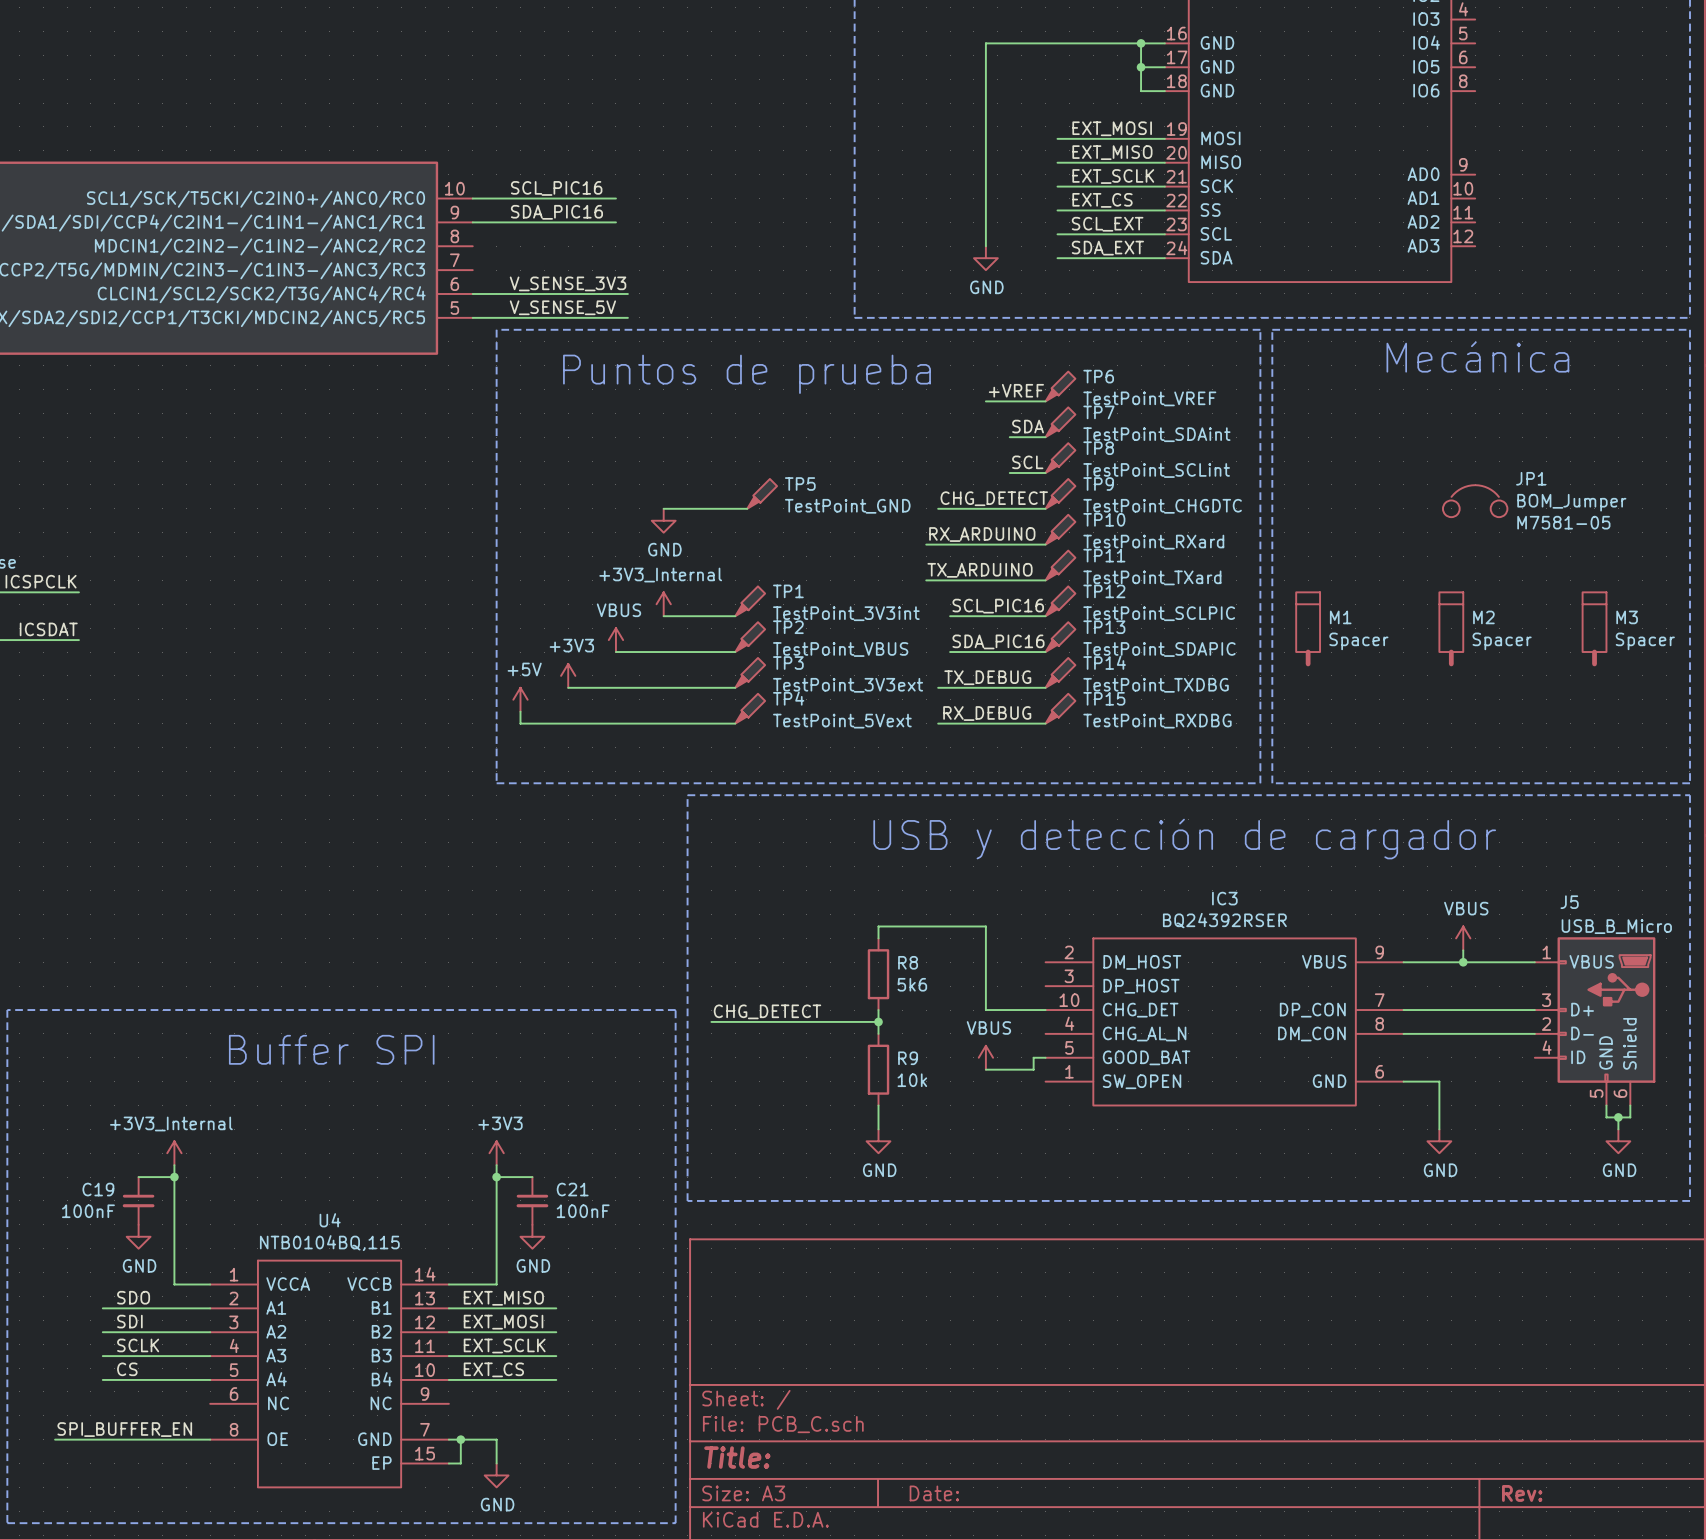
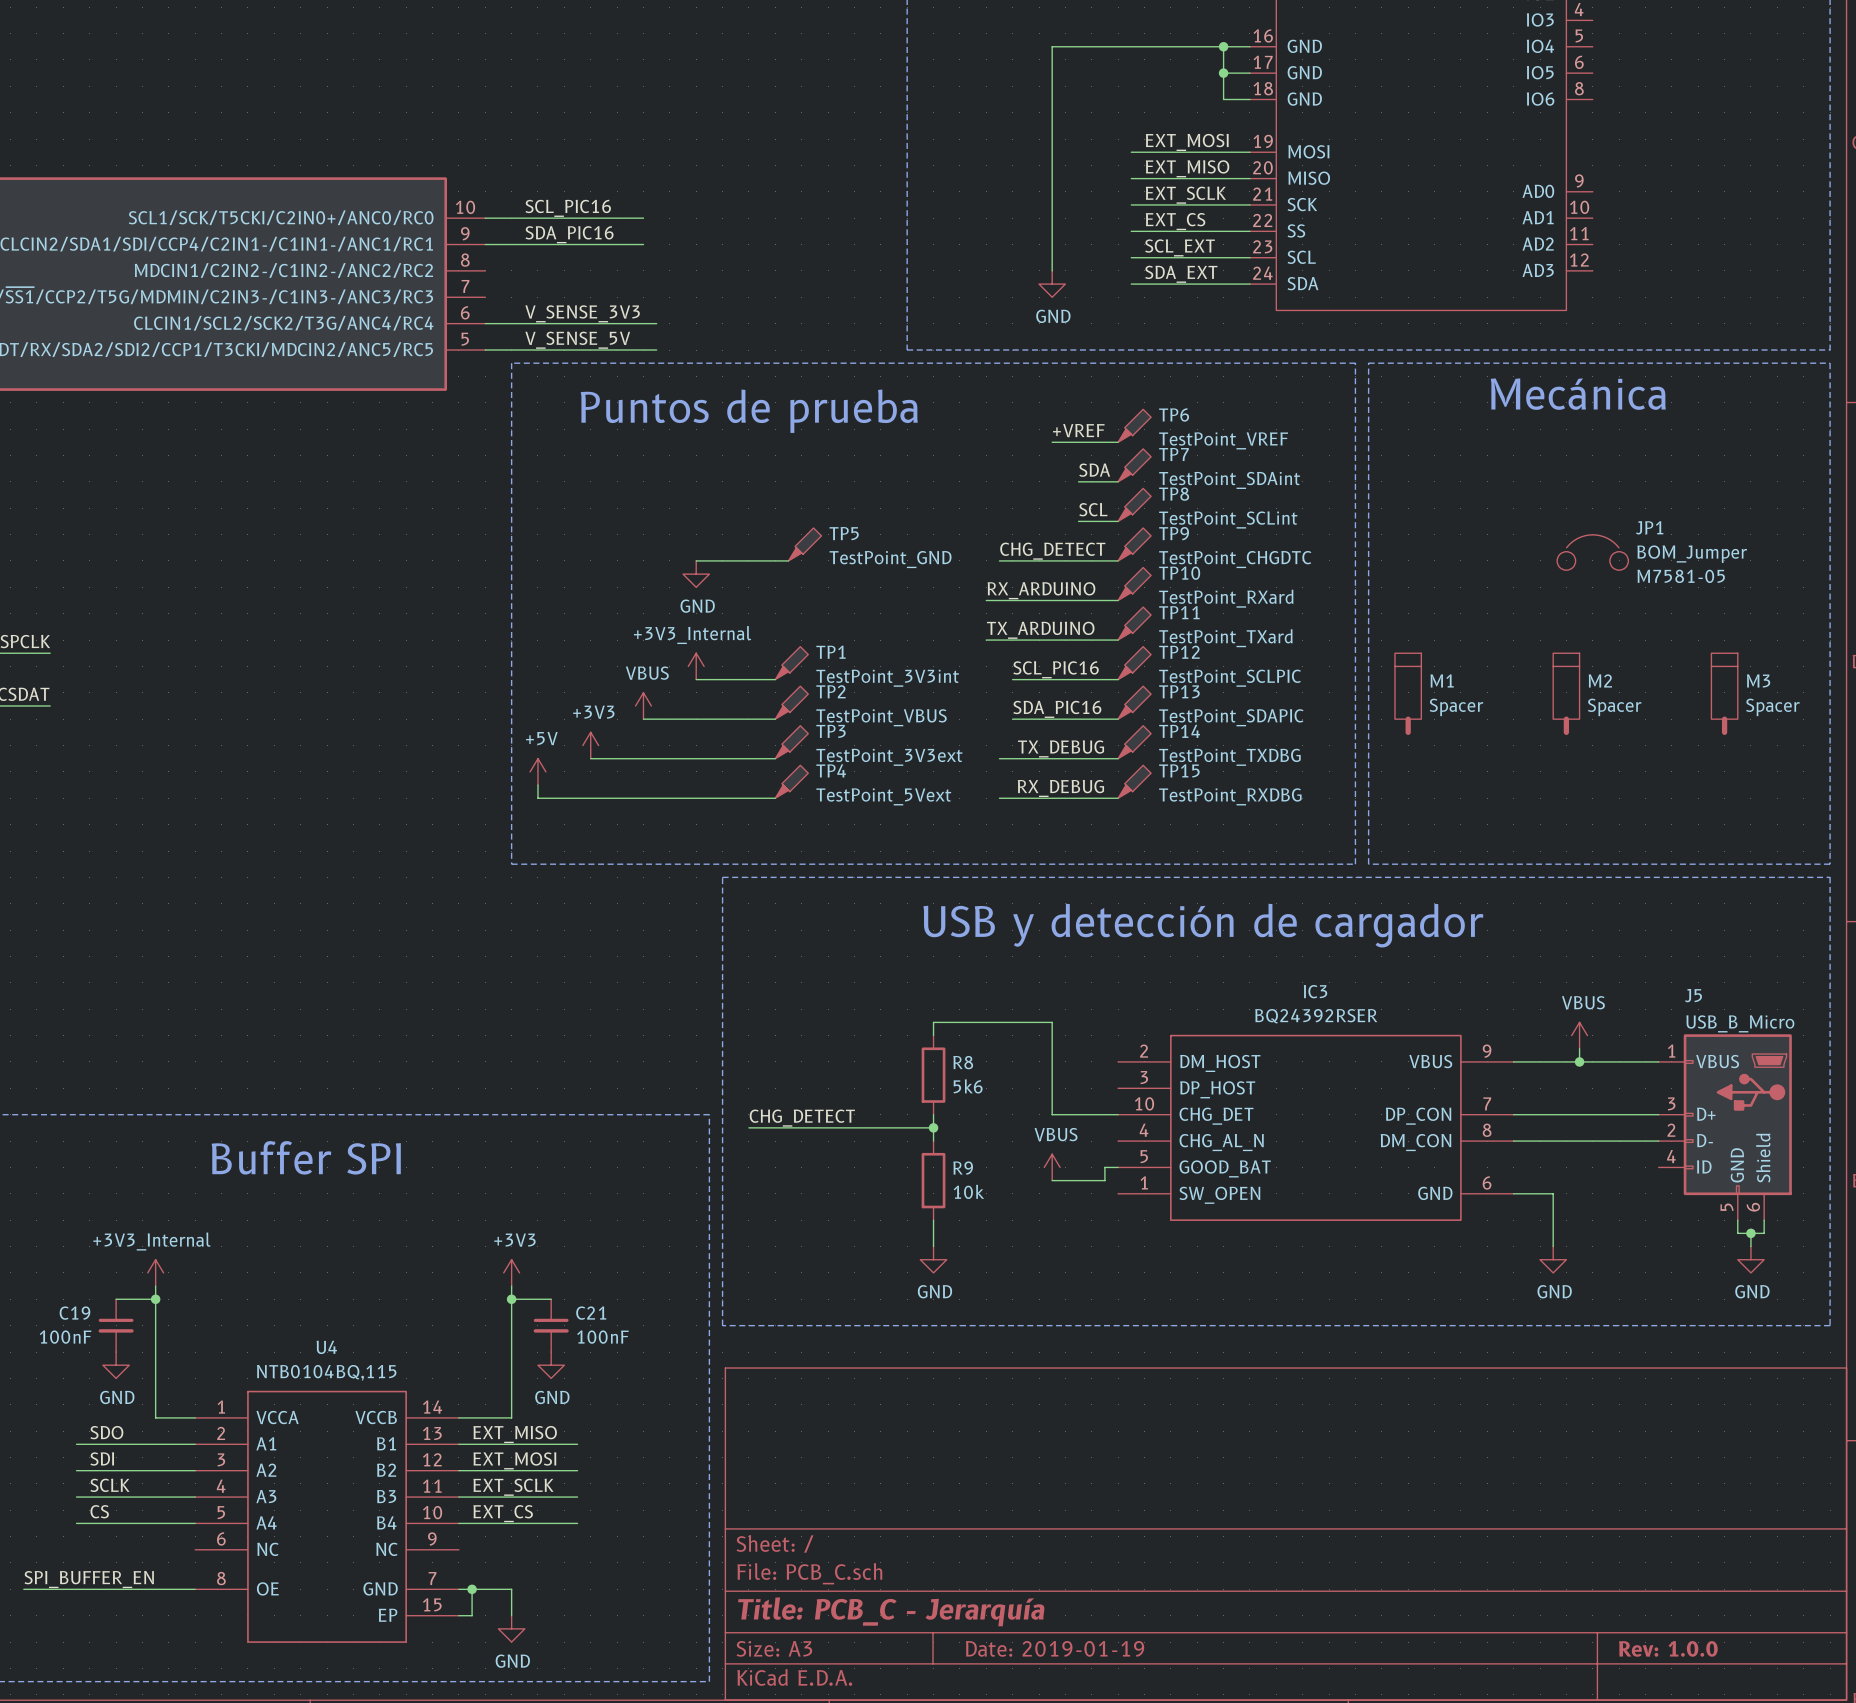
title block: Title: (737, 1457) -> Title: PCB_C - Jerarquía (891, 1611)
title block: Date: (934, 1493) -> Date: 2019-01-19 (1055, 1648)
title block: Rev: (1522, 1493) -> Rev: 1.0.0 (1668, 1648)

